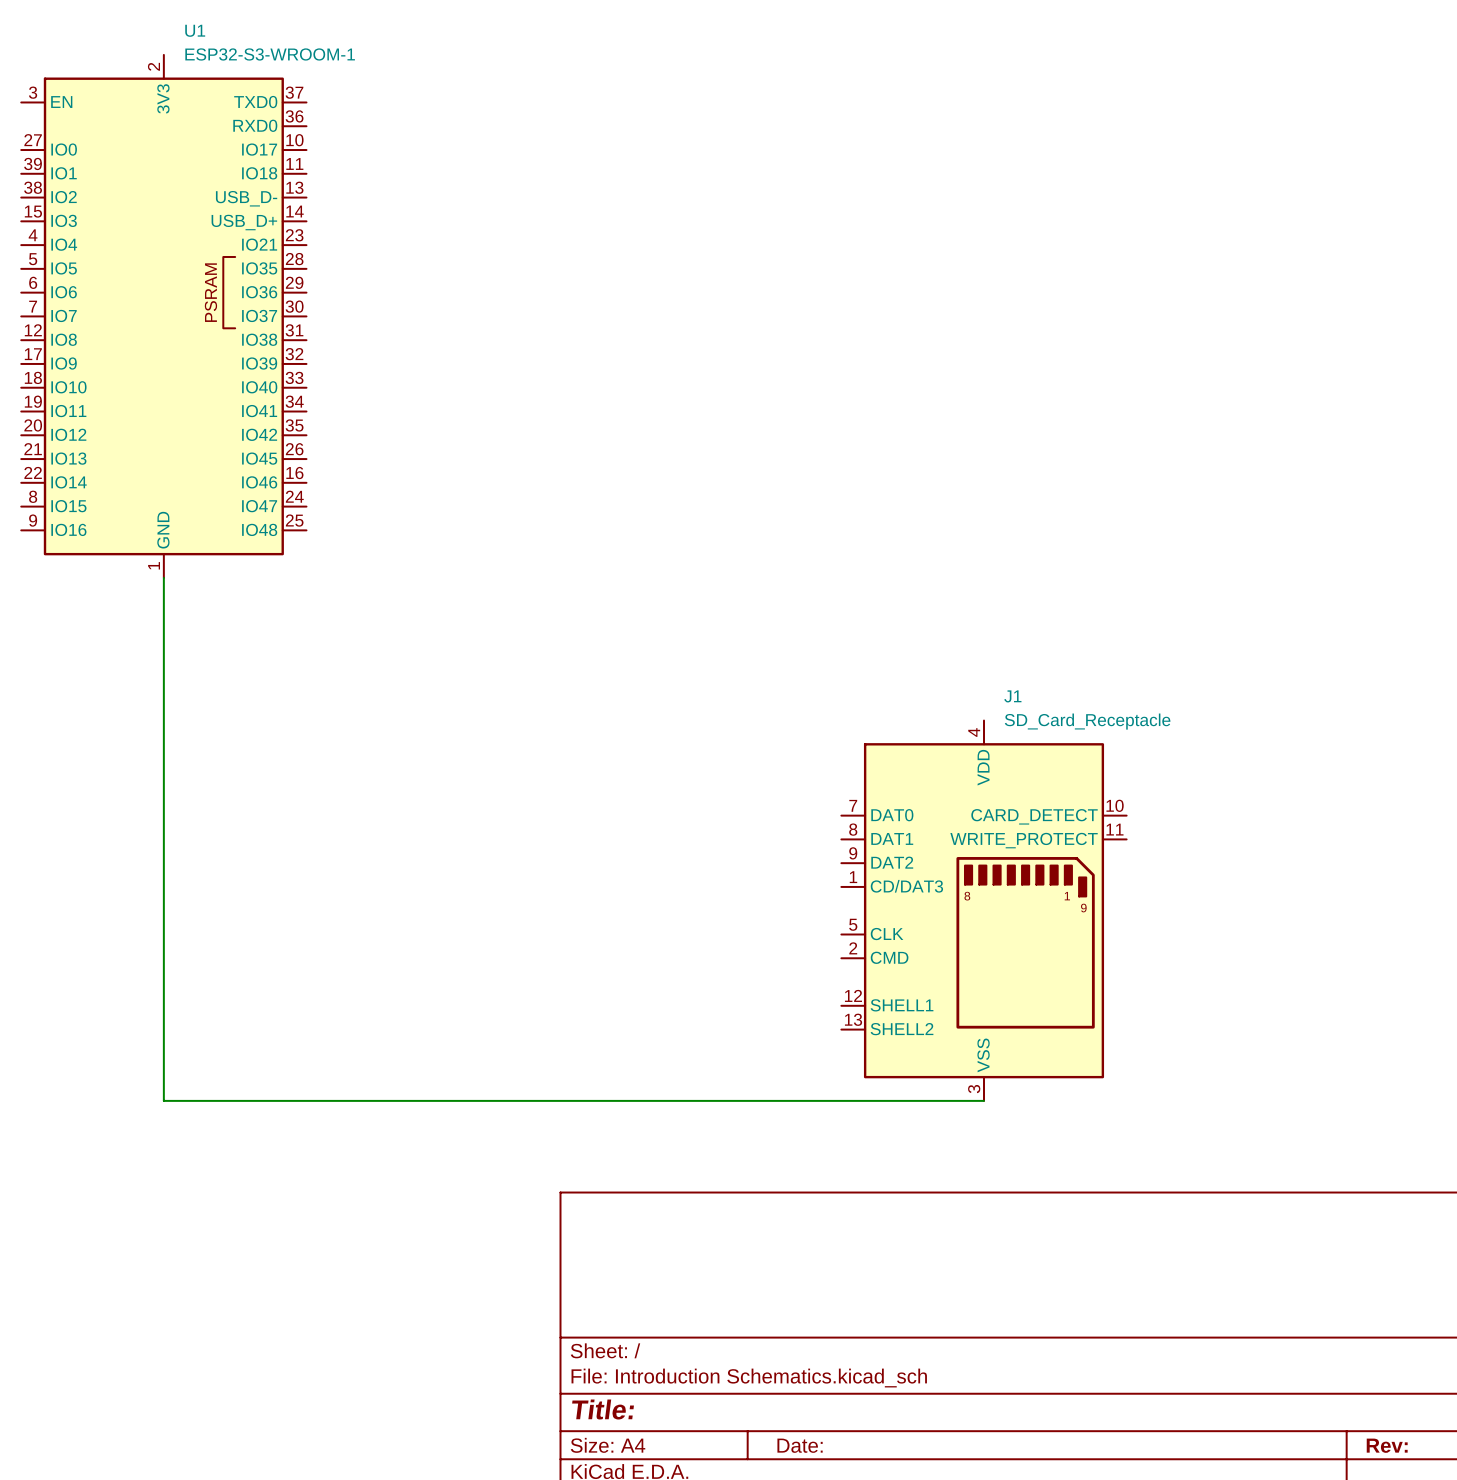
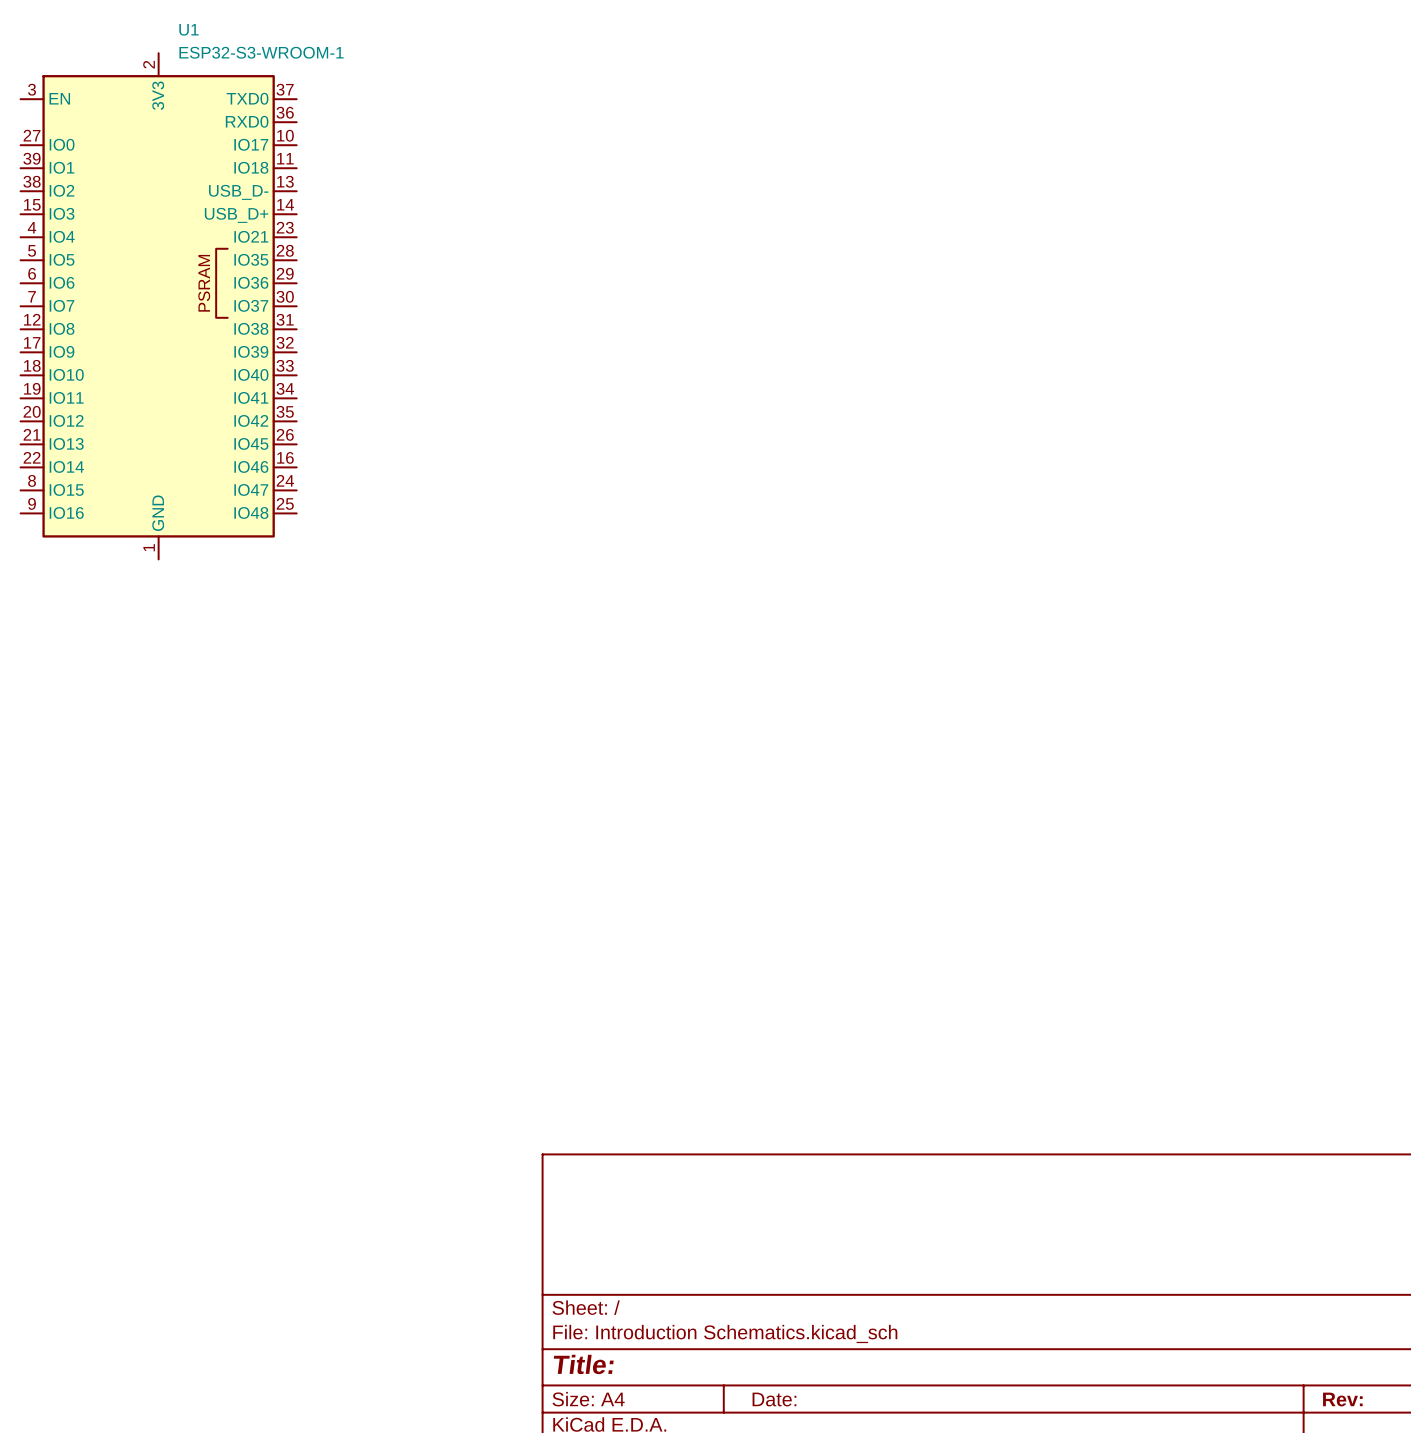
wire: (163, 577) (163, 1100) (984, 1100) -> none
J1: SD_Card_Receptacle (984, 910) -> none

